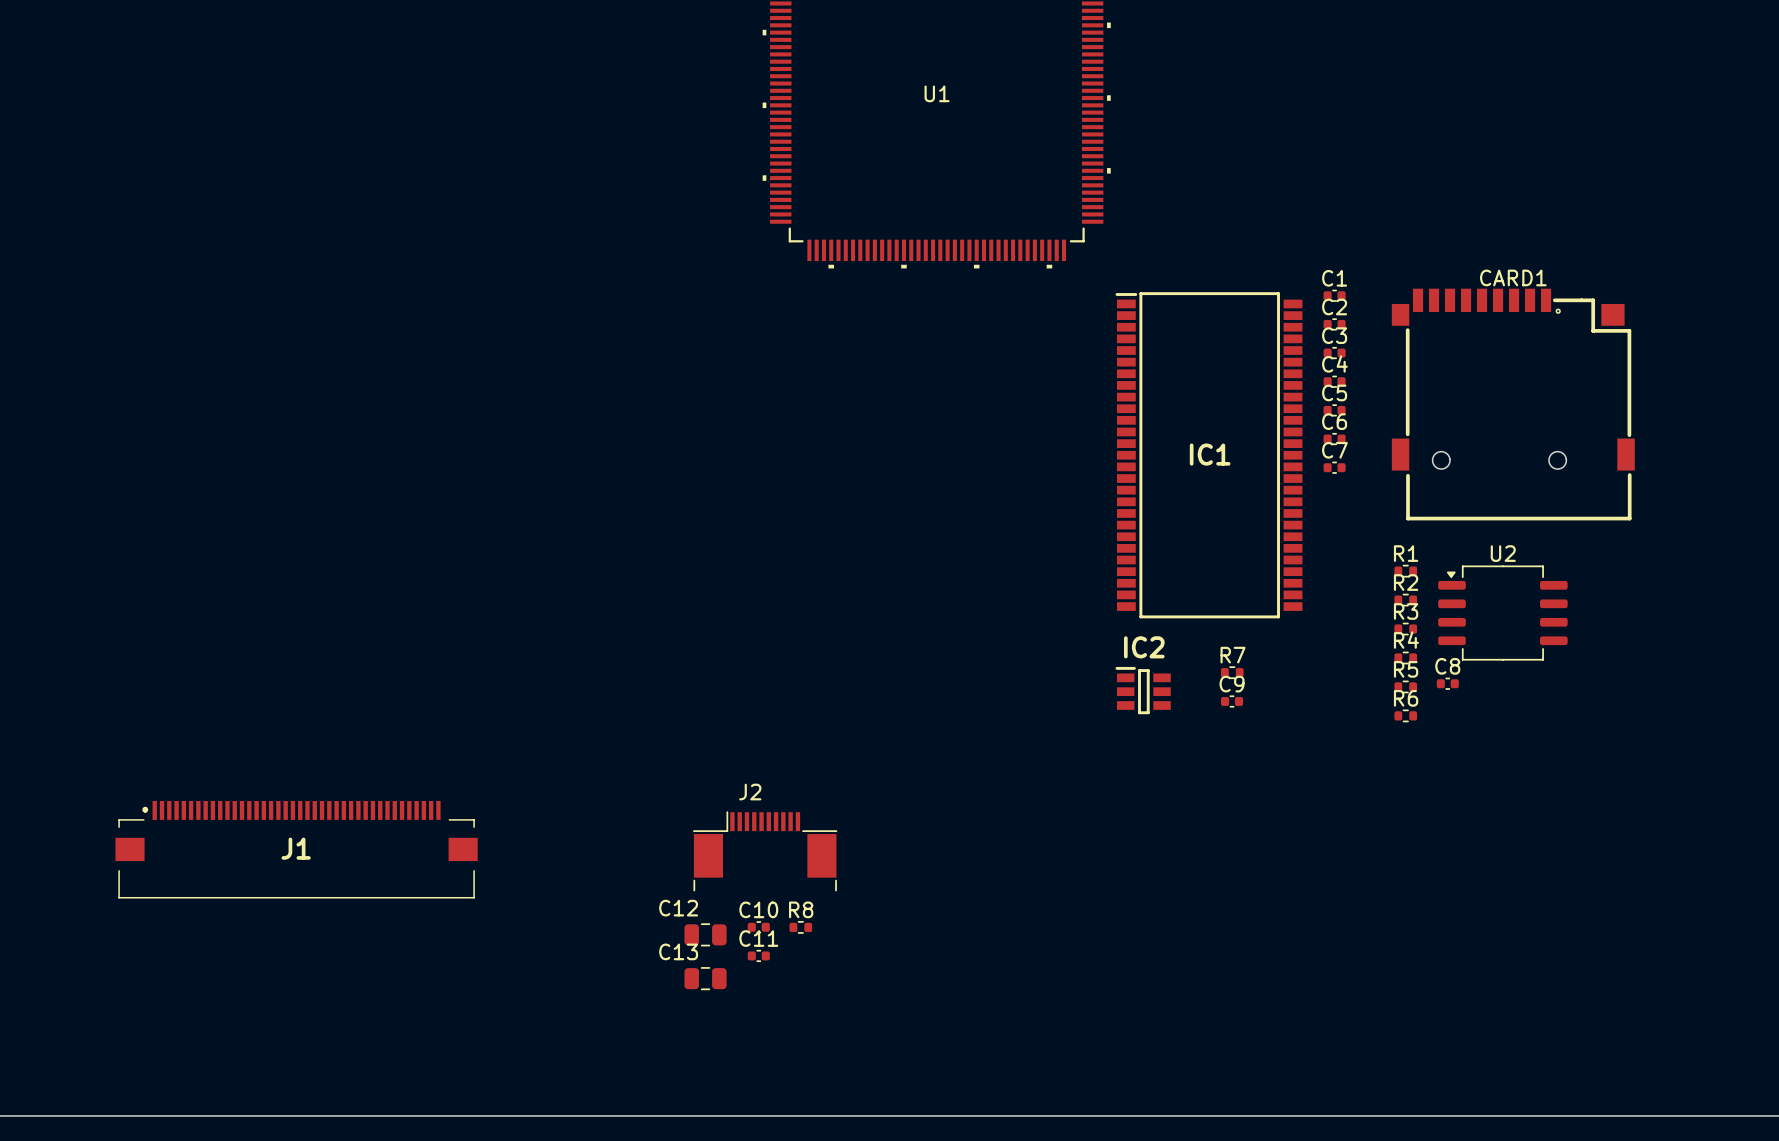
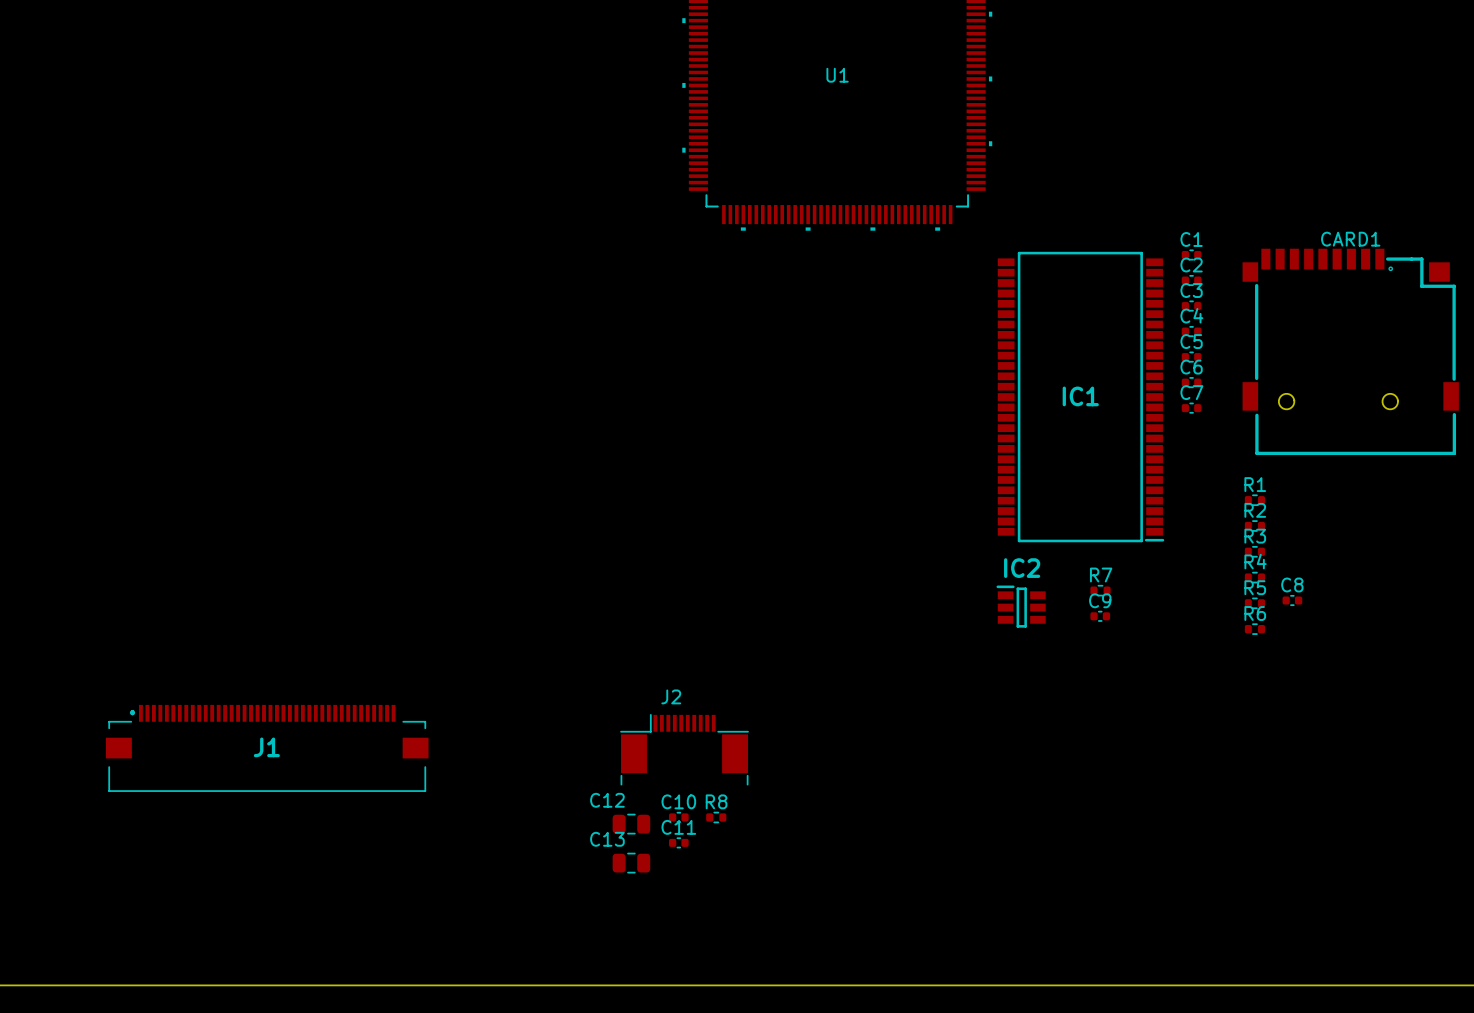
IC1 rotation: 0° (1208, 455) -> 180° (1081, 397)
U2: (1502, 613) -> none

